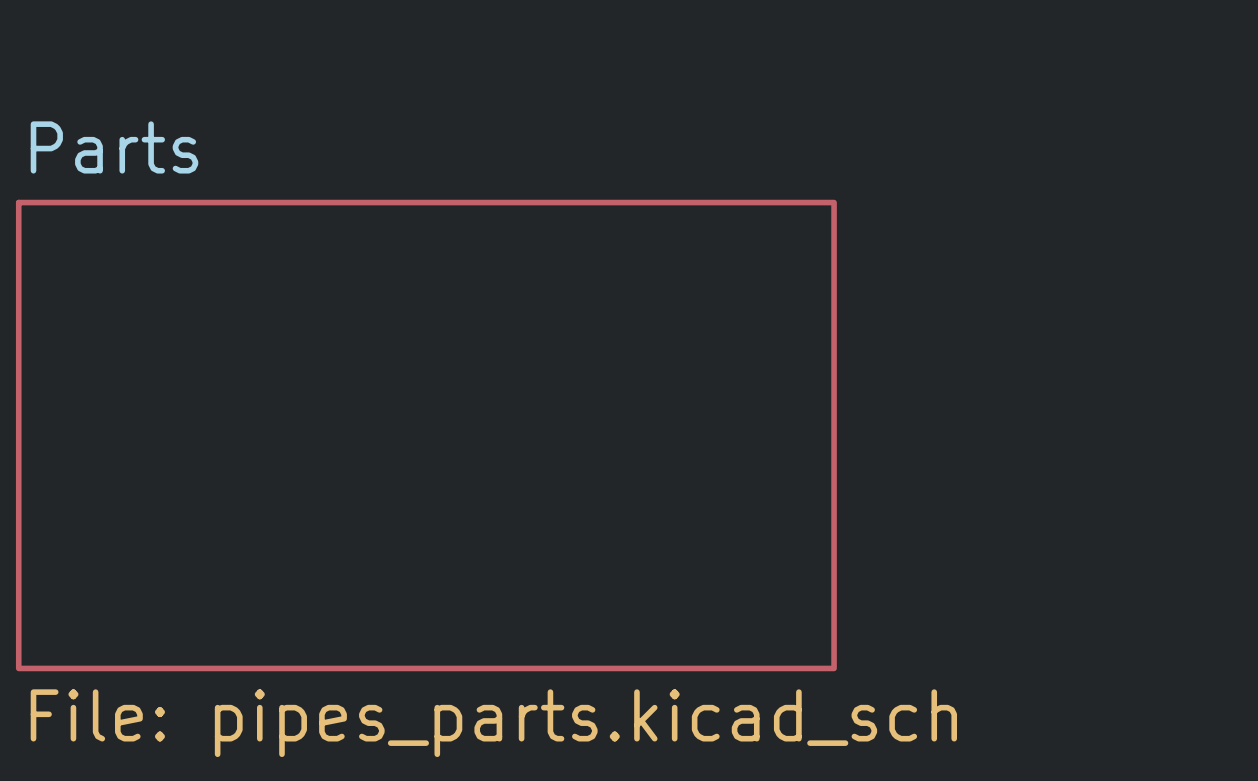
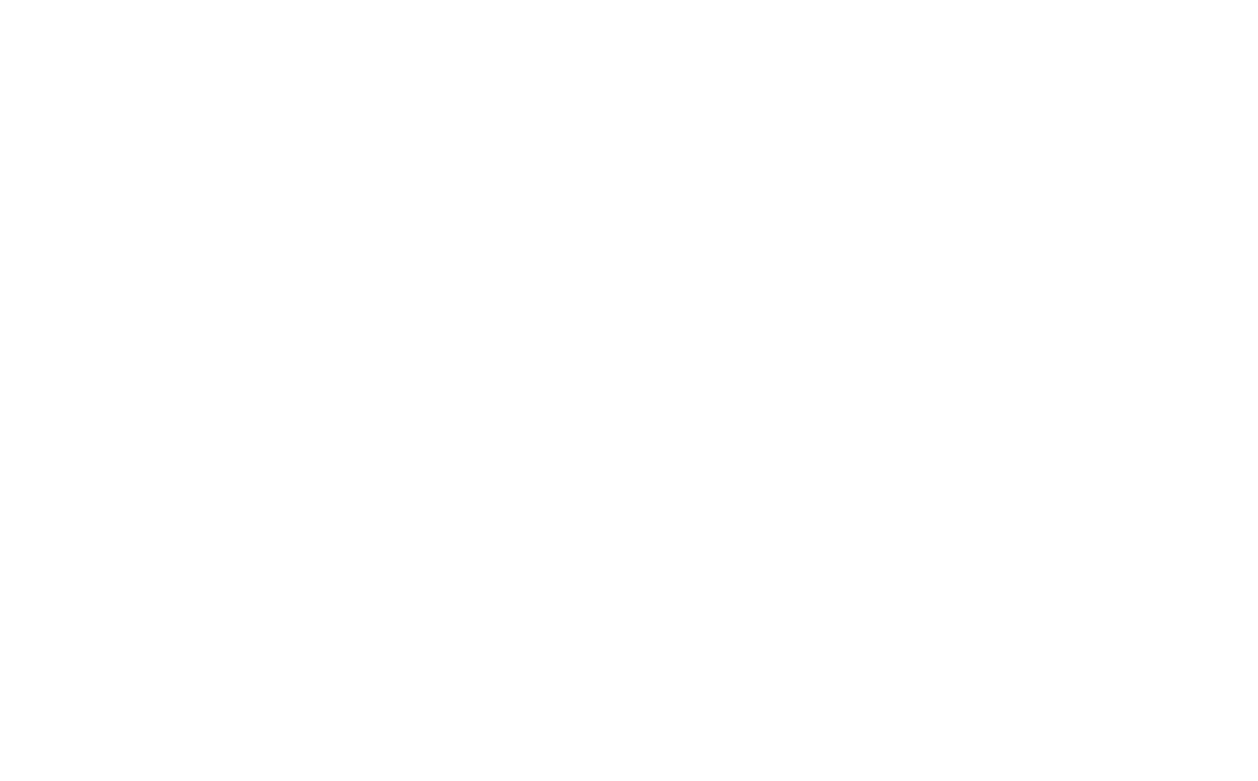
sheet Parts: File: pipes_parts.kicad_sch (426, 435) -> none

